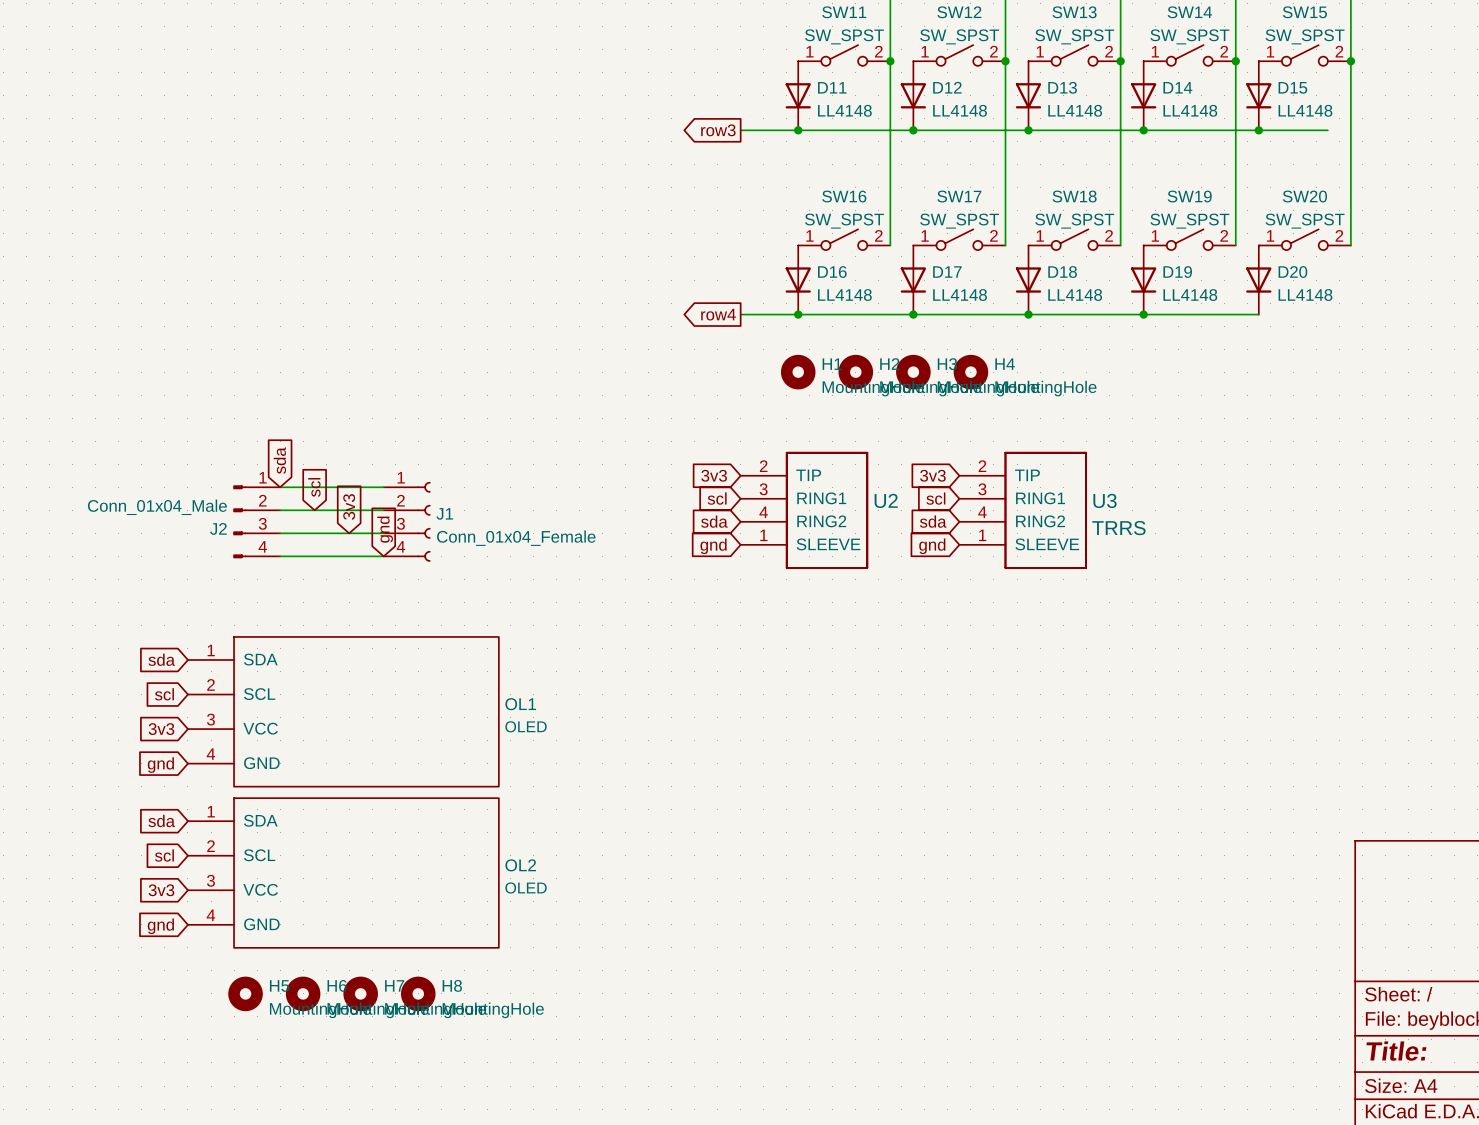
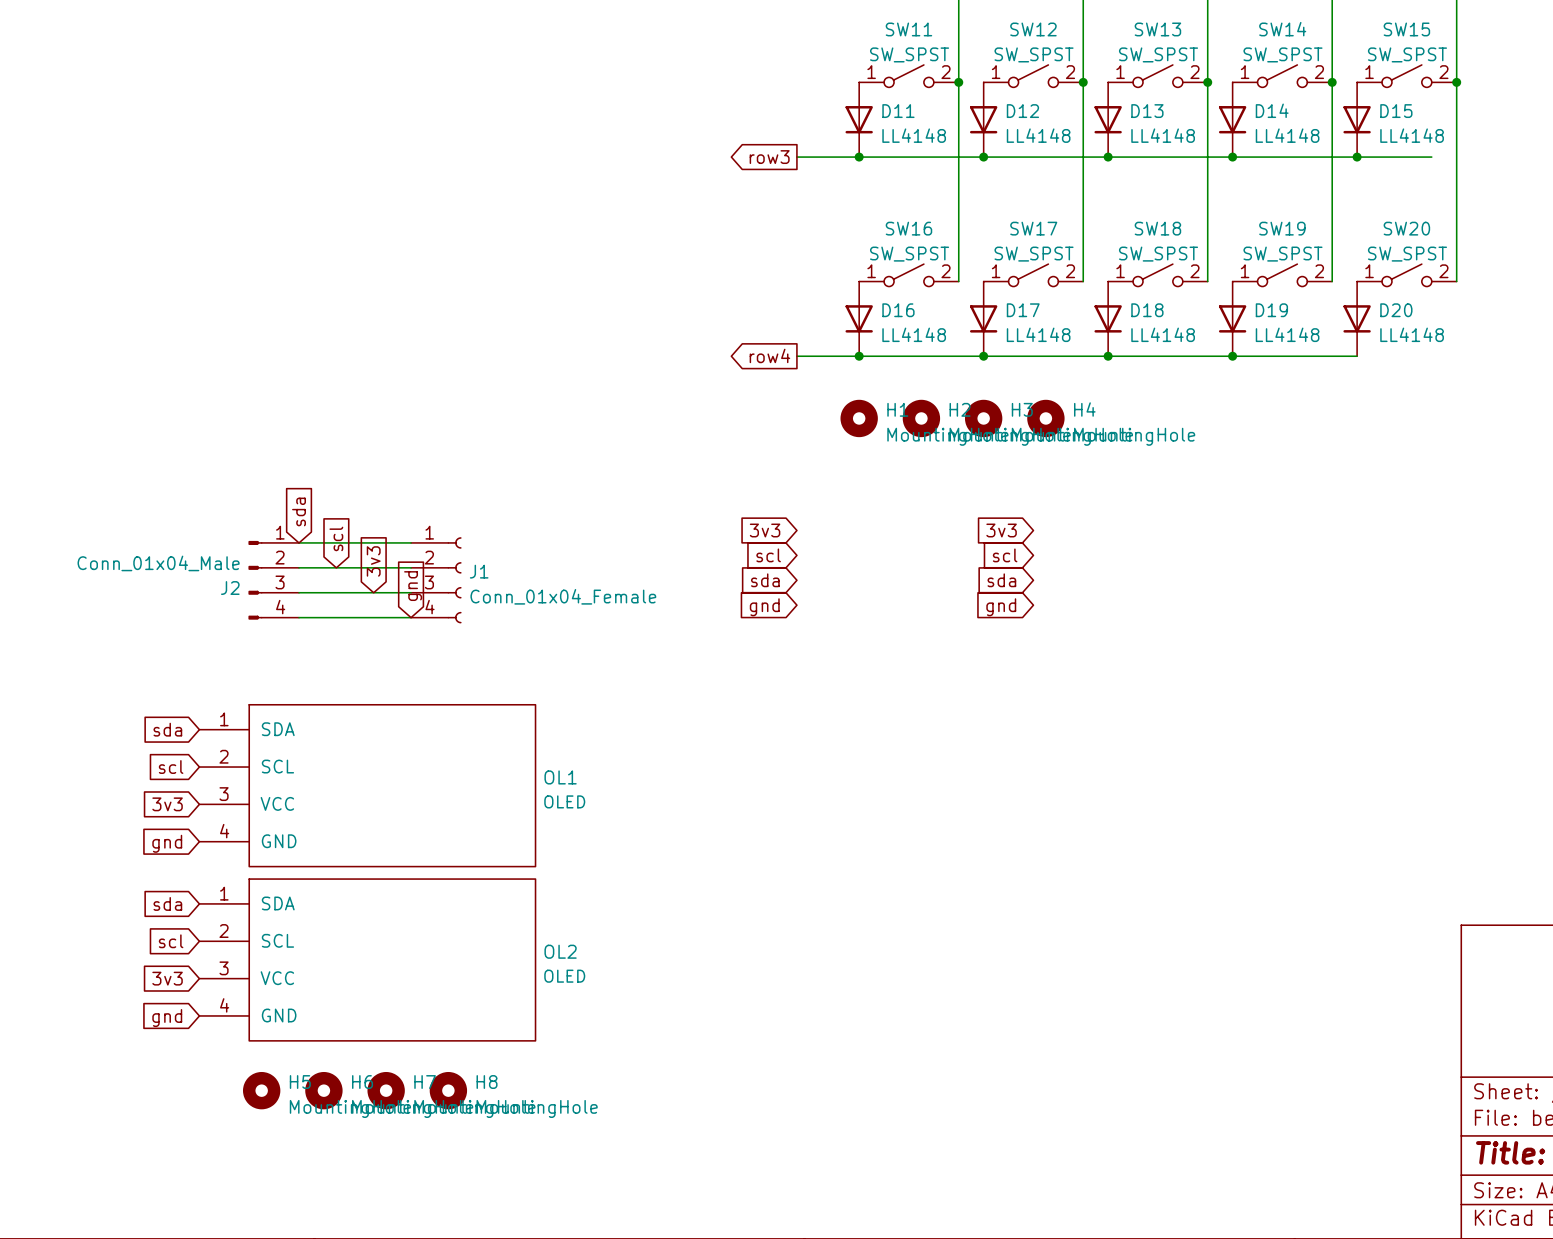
U2: (803, 510) -> none
U3: TRRS (1022, 510) -> none

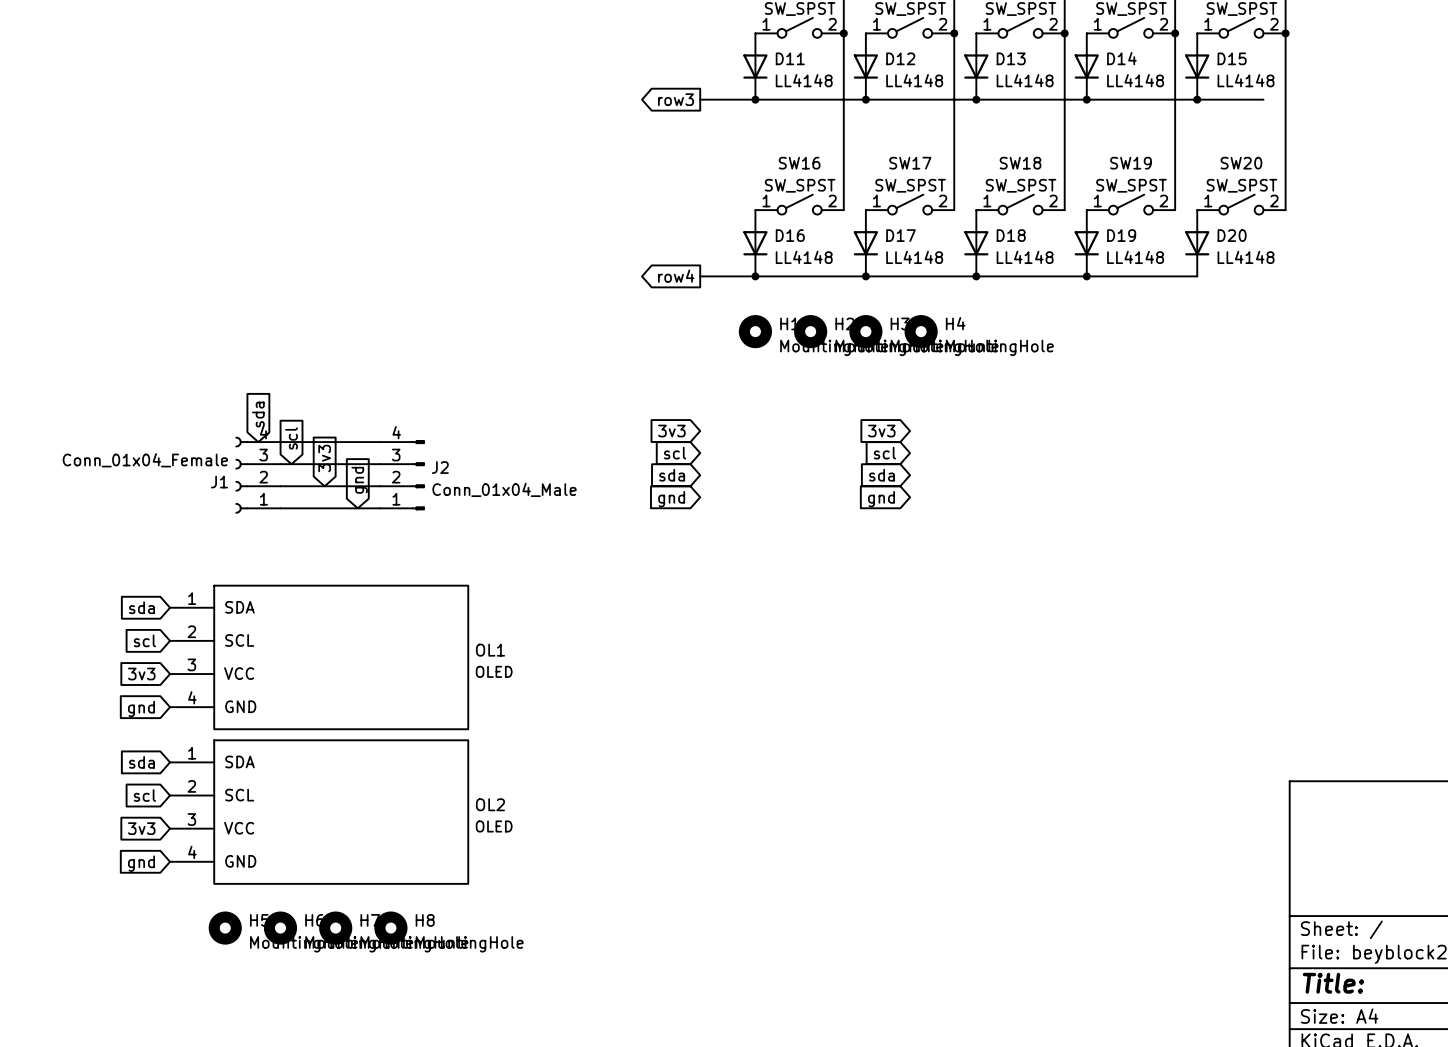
J2 rotation: 0° (255, 580) -> 180° (418, 475)
J2 position: (273, 580) -> (402, 475)
J1 position: (436, 580) -> (258, 475)
J1 rotation: 0° (454, 580) -> 180° (241, 475)

